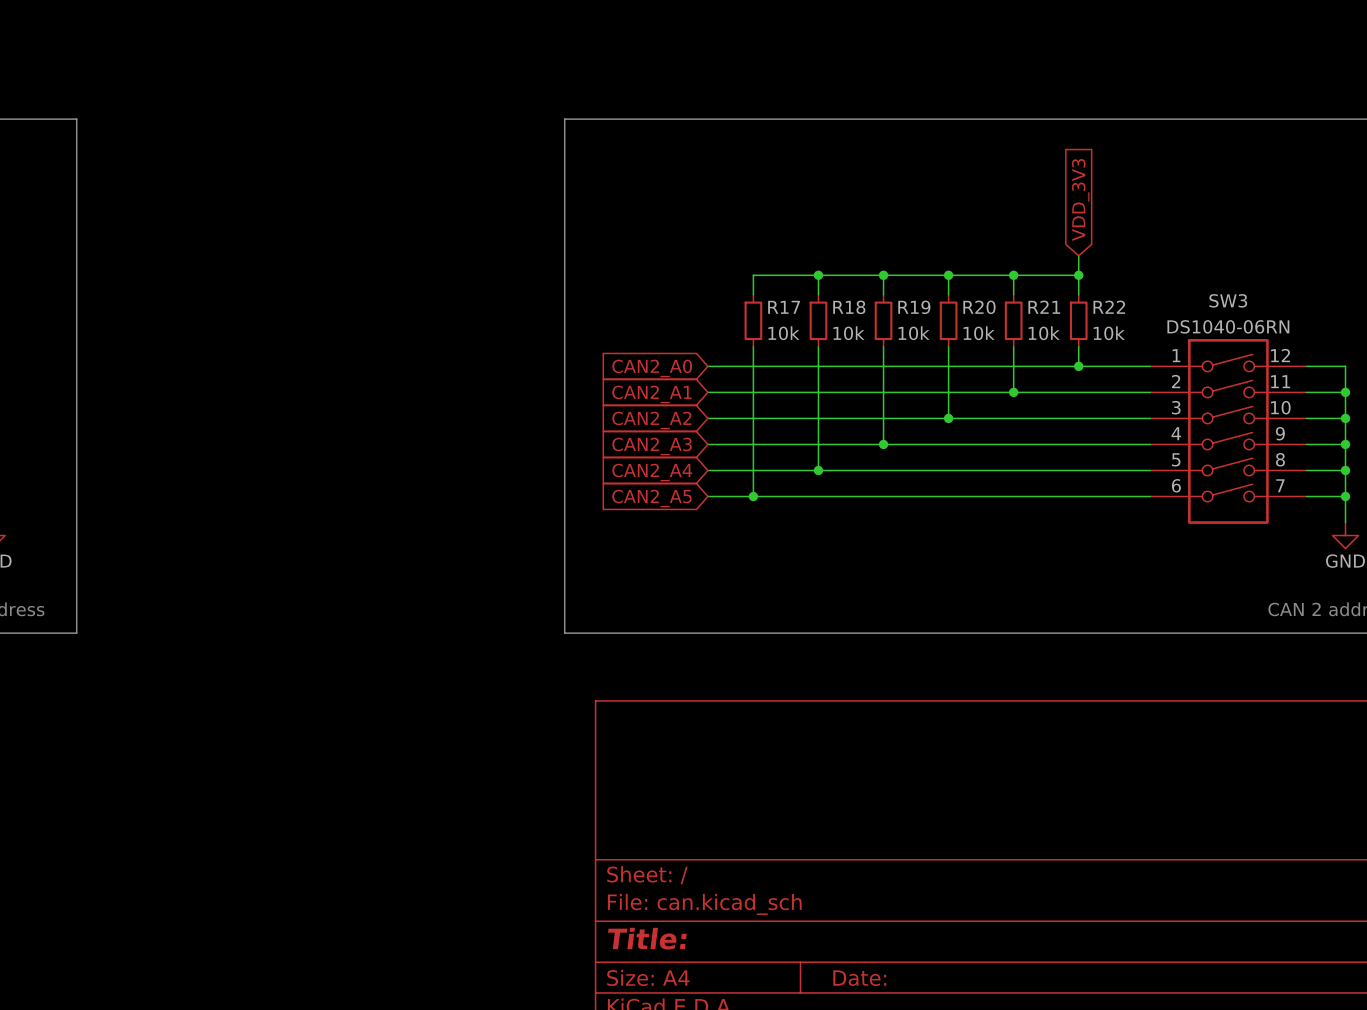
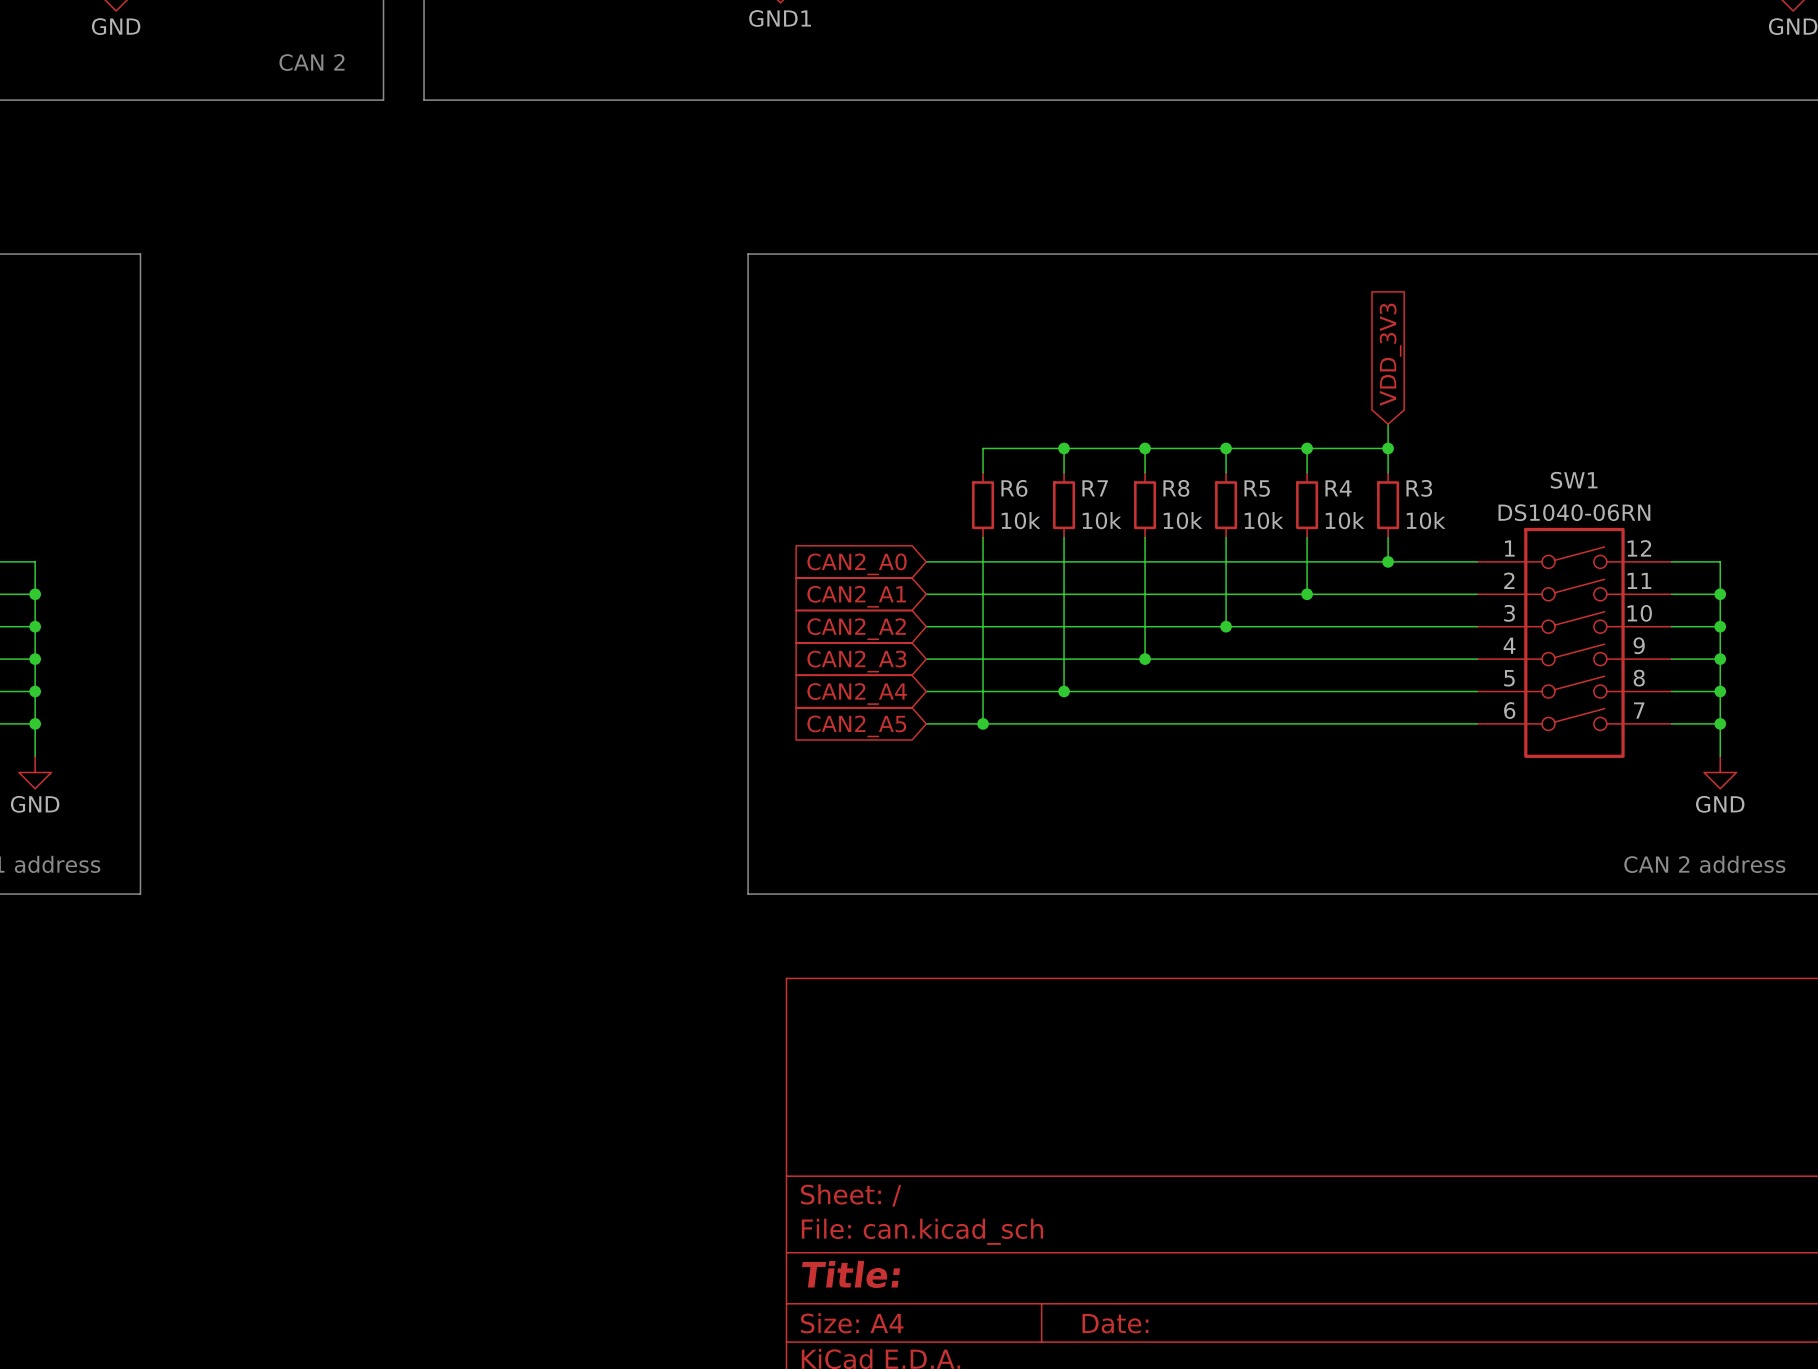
SW3 name: SW3 (1228, 300) -> SW1 (1574, 480)
R17 name: R17 (784, 307) -> R6 (1014, 488)
R18 name: R18 (849, 307) -> R7 (1095, 488)
R19 name: R19 (914, 307) -> R8 (1176, 488)
R20 name: R20 (979, 307) -> R5 (1257, 488)
R21 name: R21 (1044, 307) -> R4 (1338, 488)
R22 name: R22 (1109, 307) -> R3 (1419, 488)

